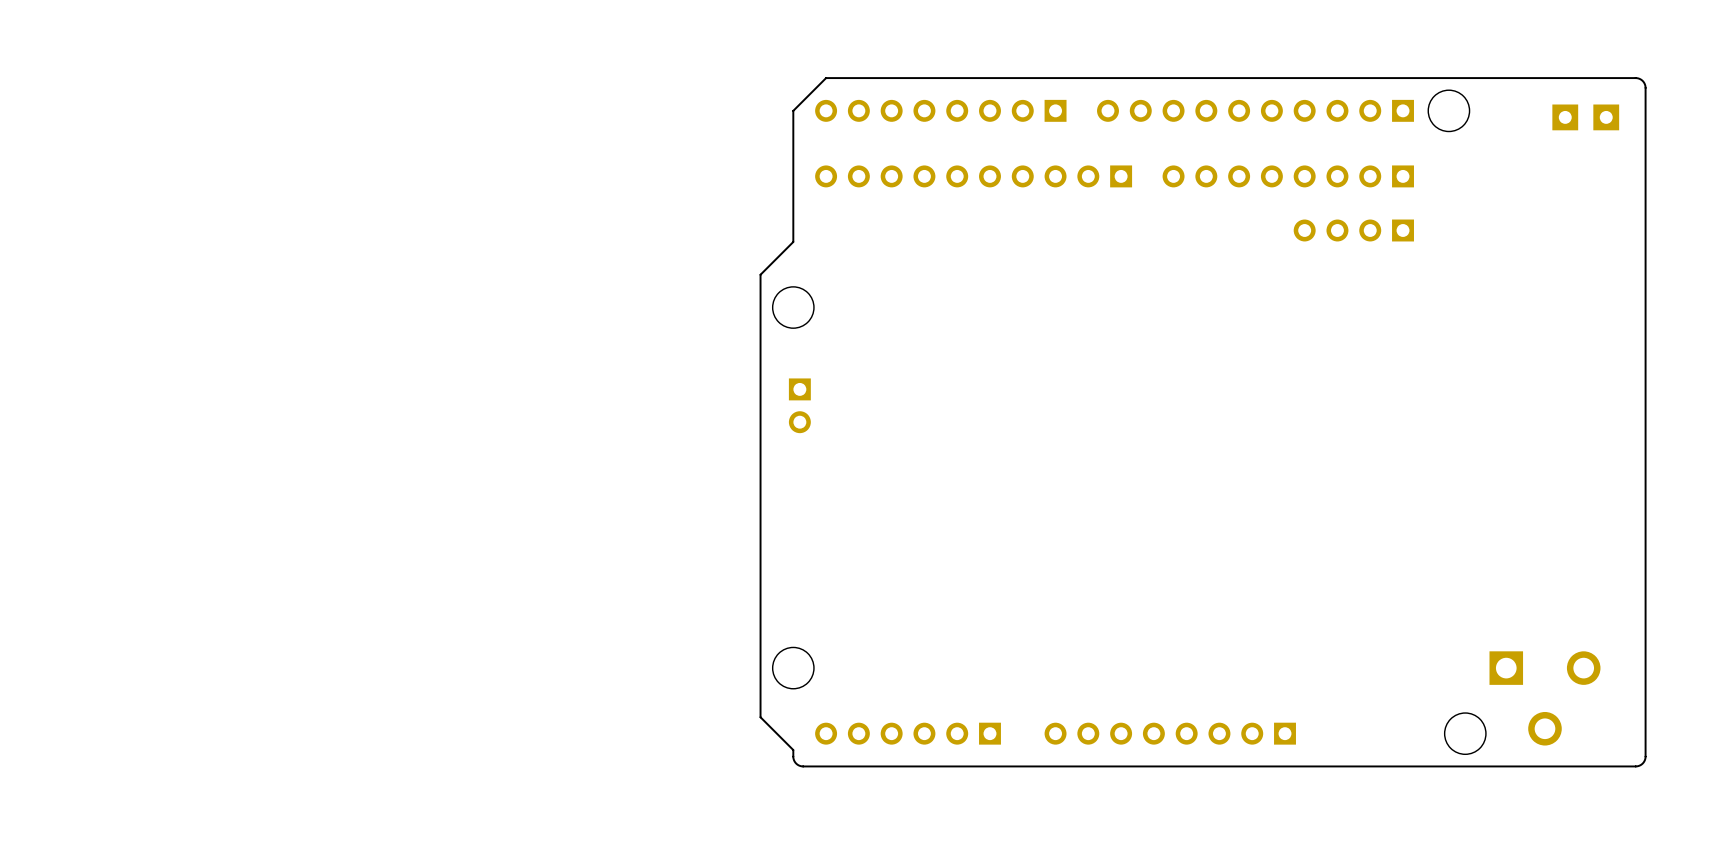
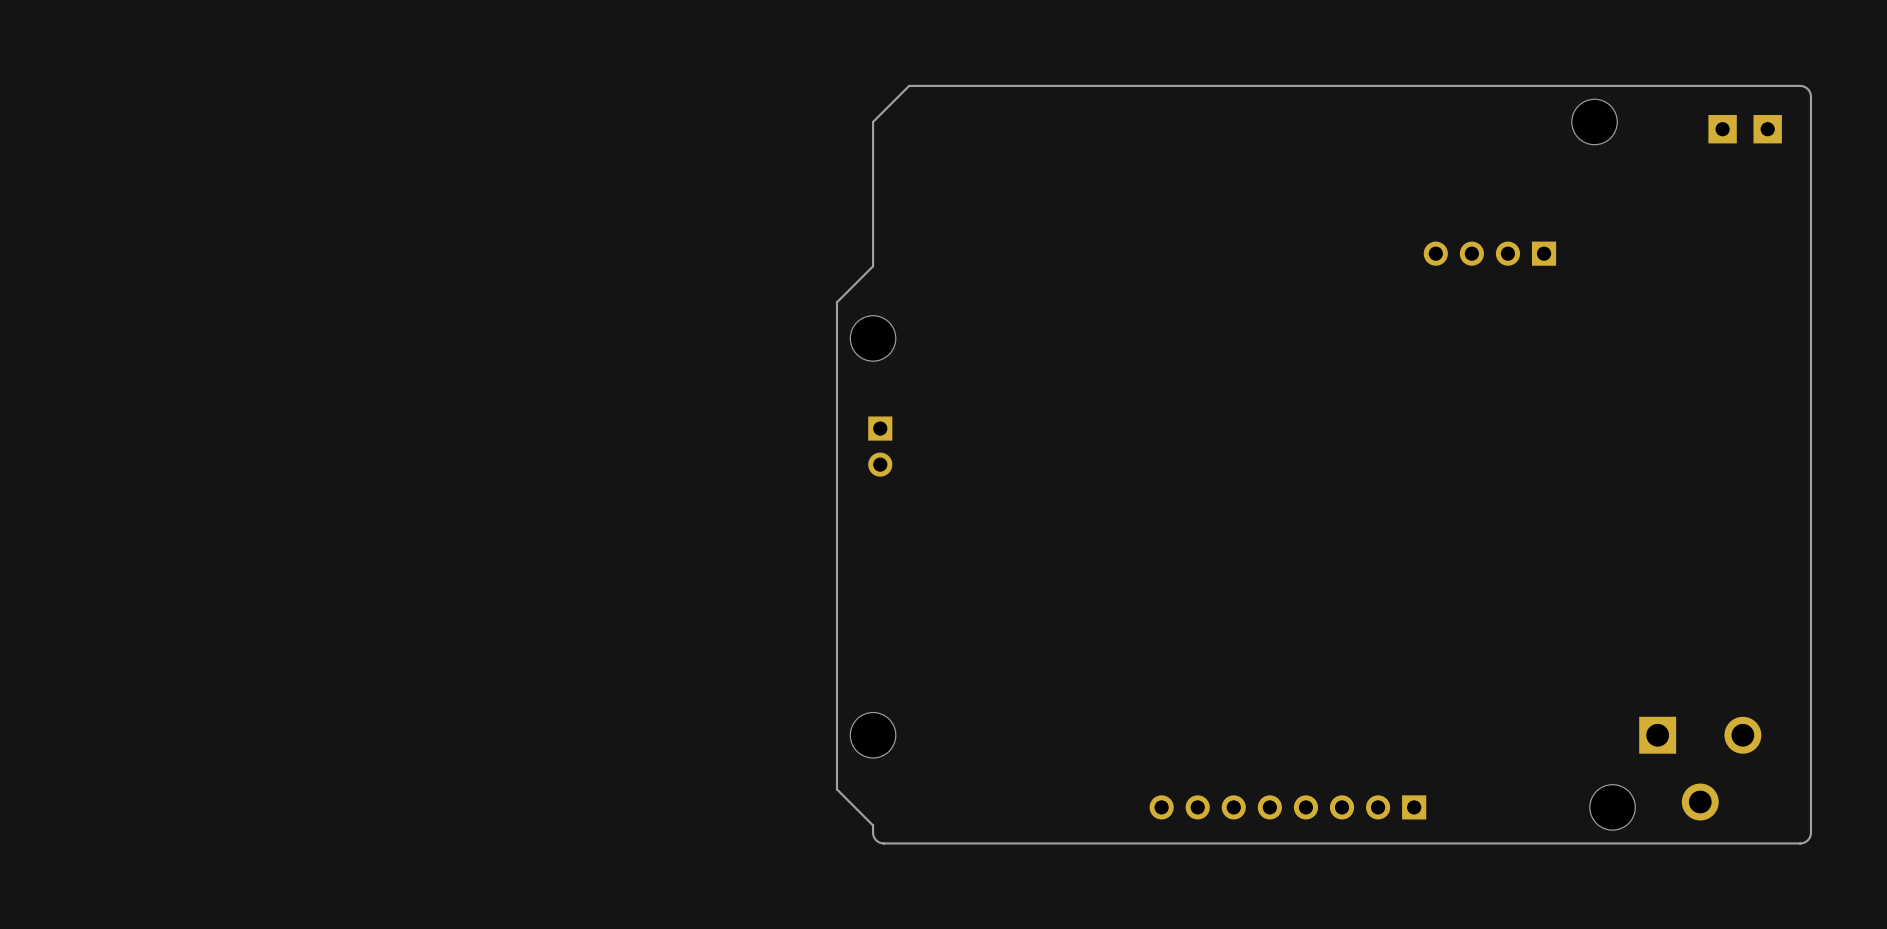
part: (940, 110) -> none
part: (1255, 110) -> none
part: (973, 176) -> none
part: (1288, 176) -> none
part: (908, 733) -> none

